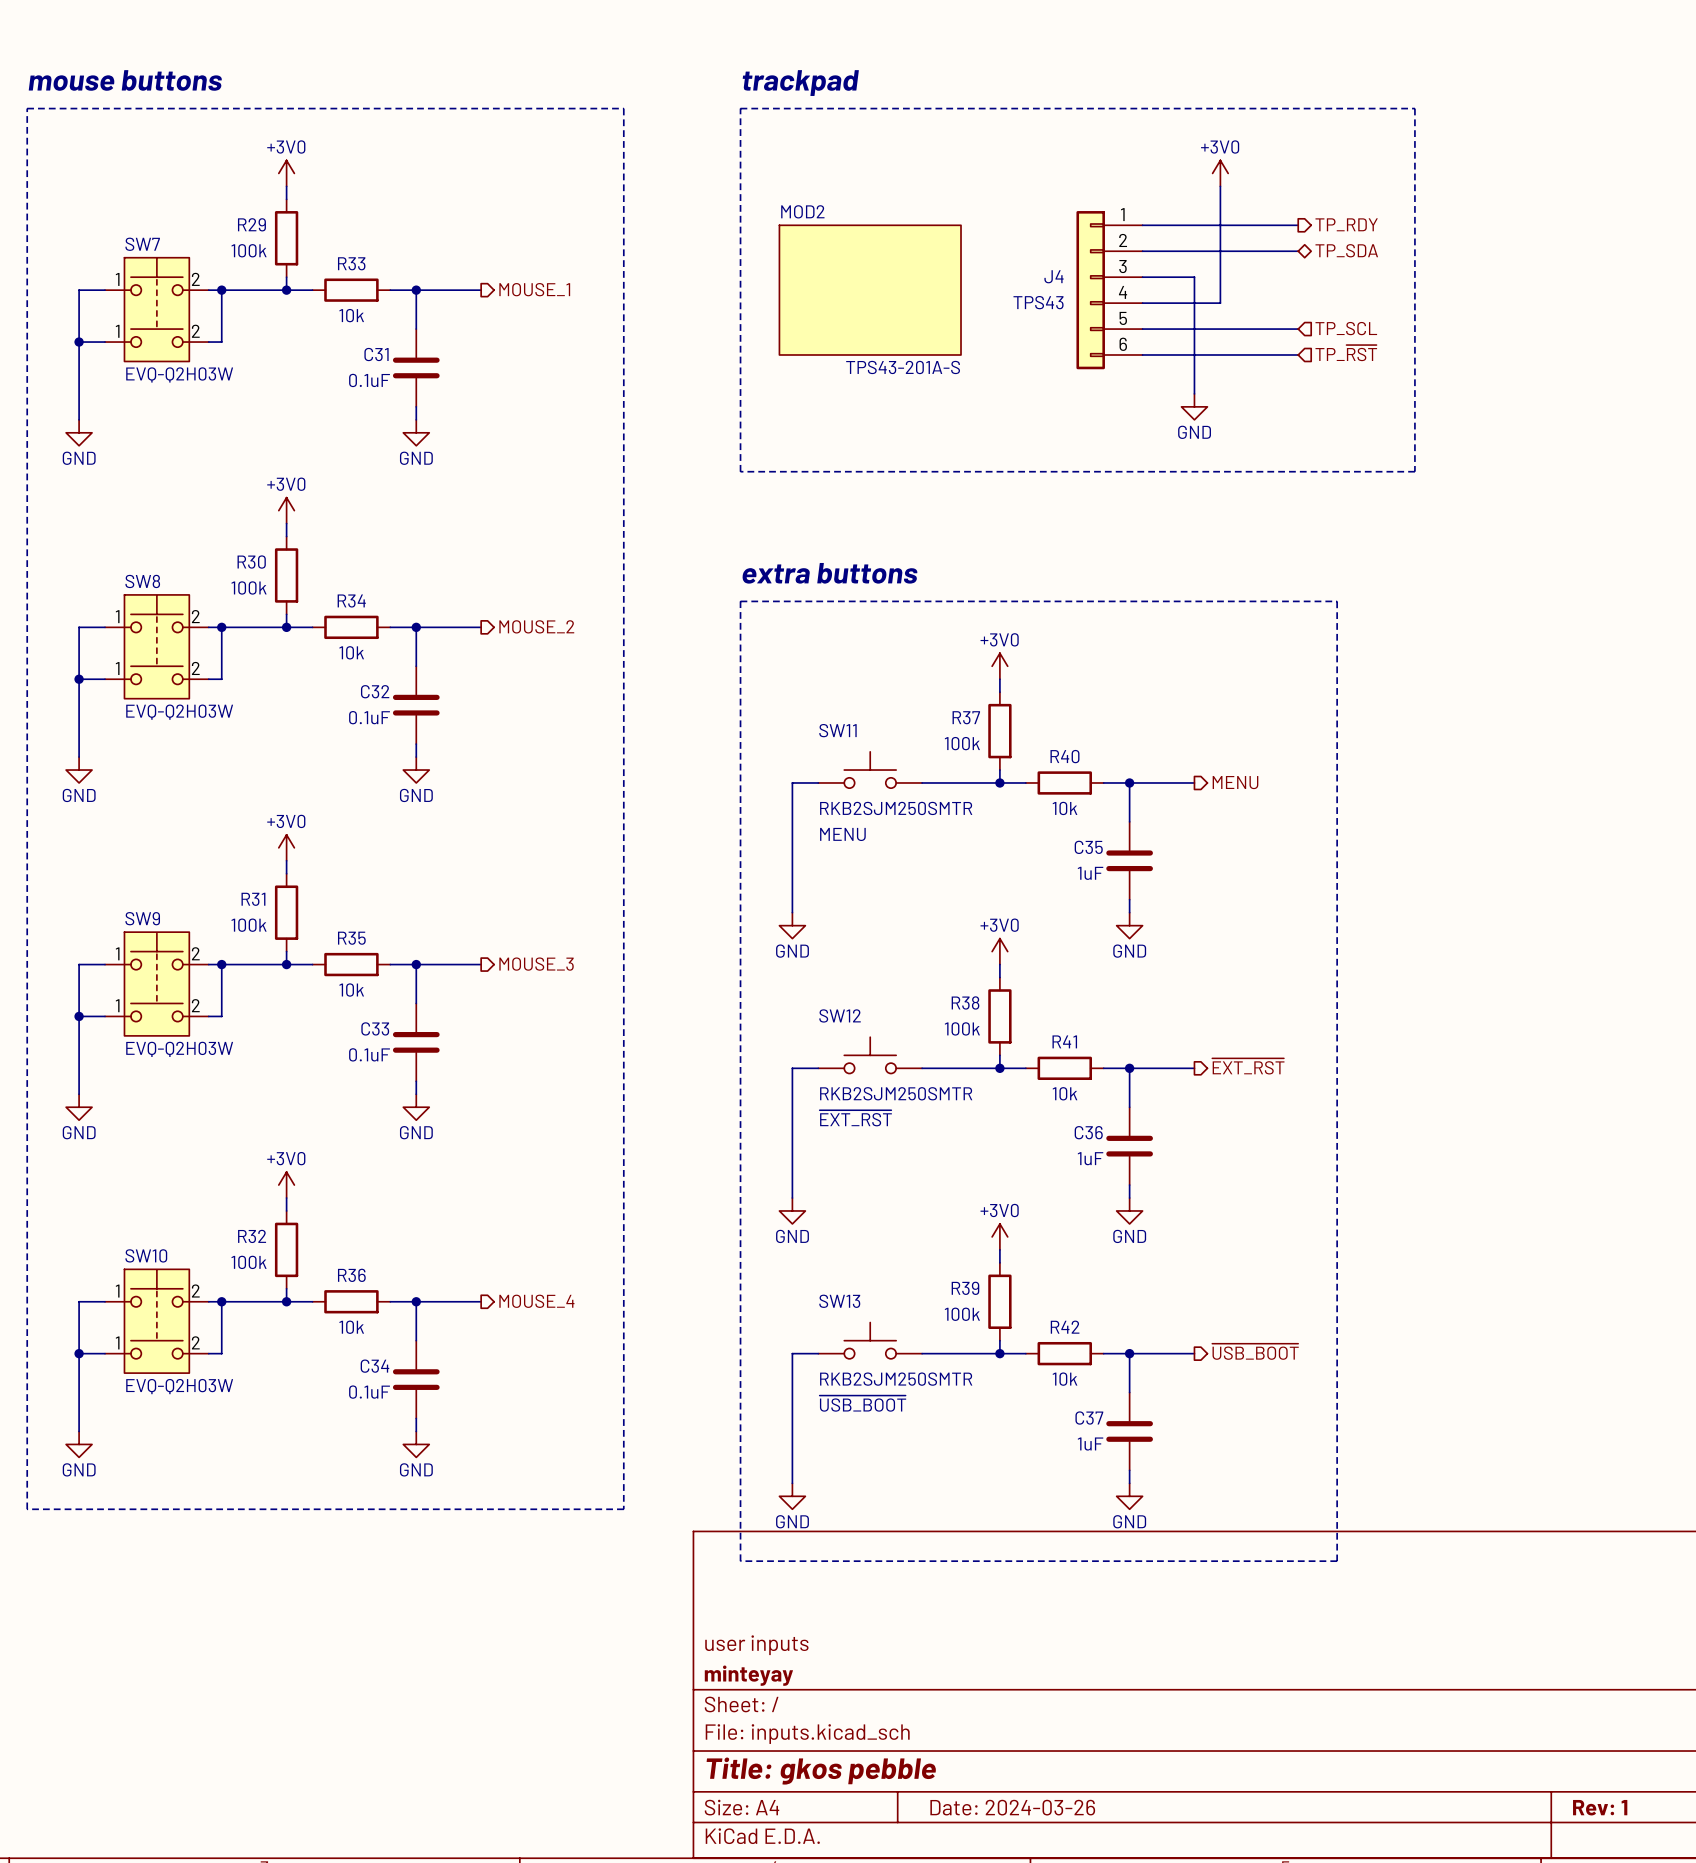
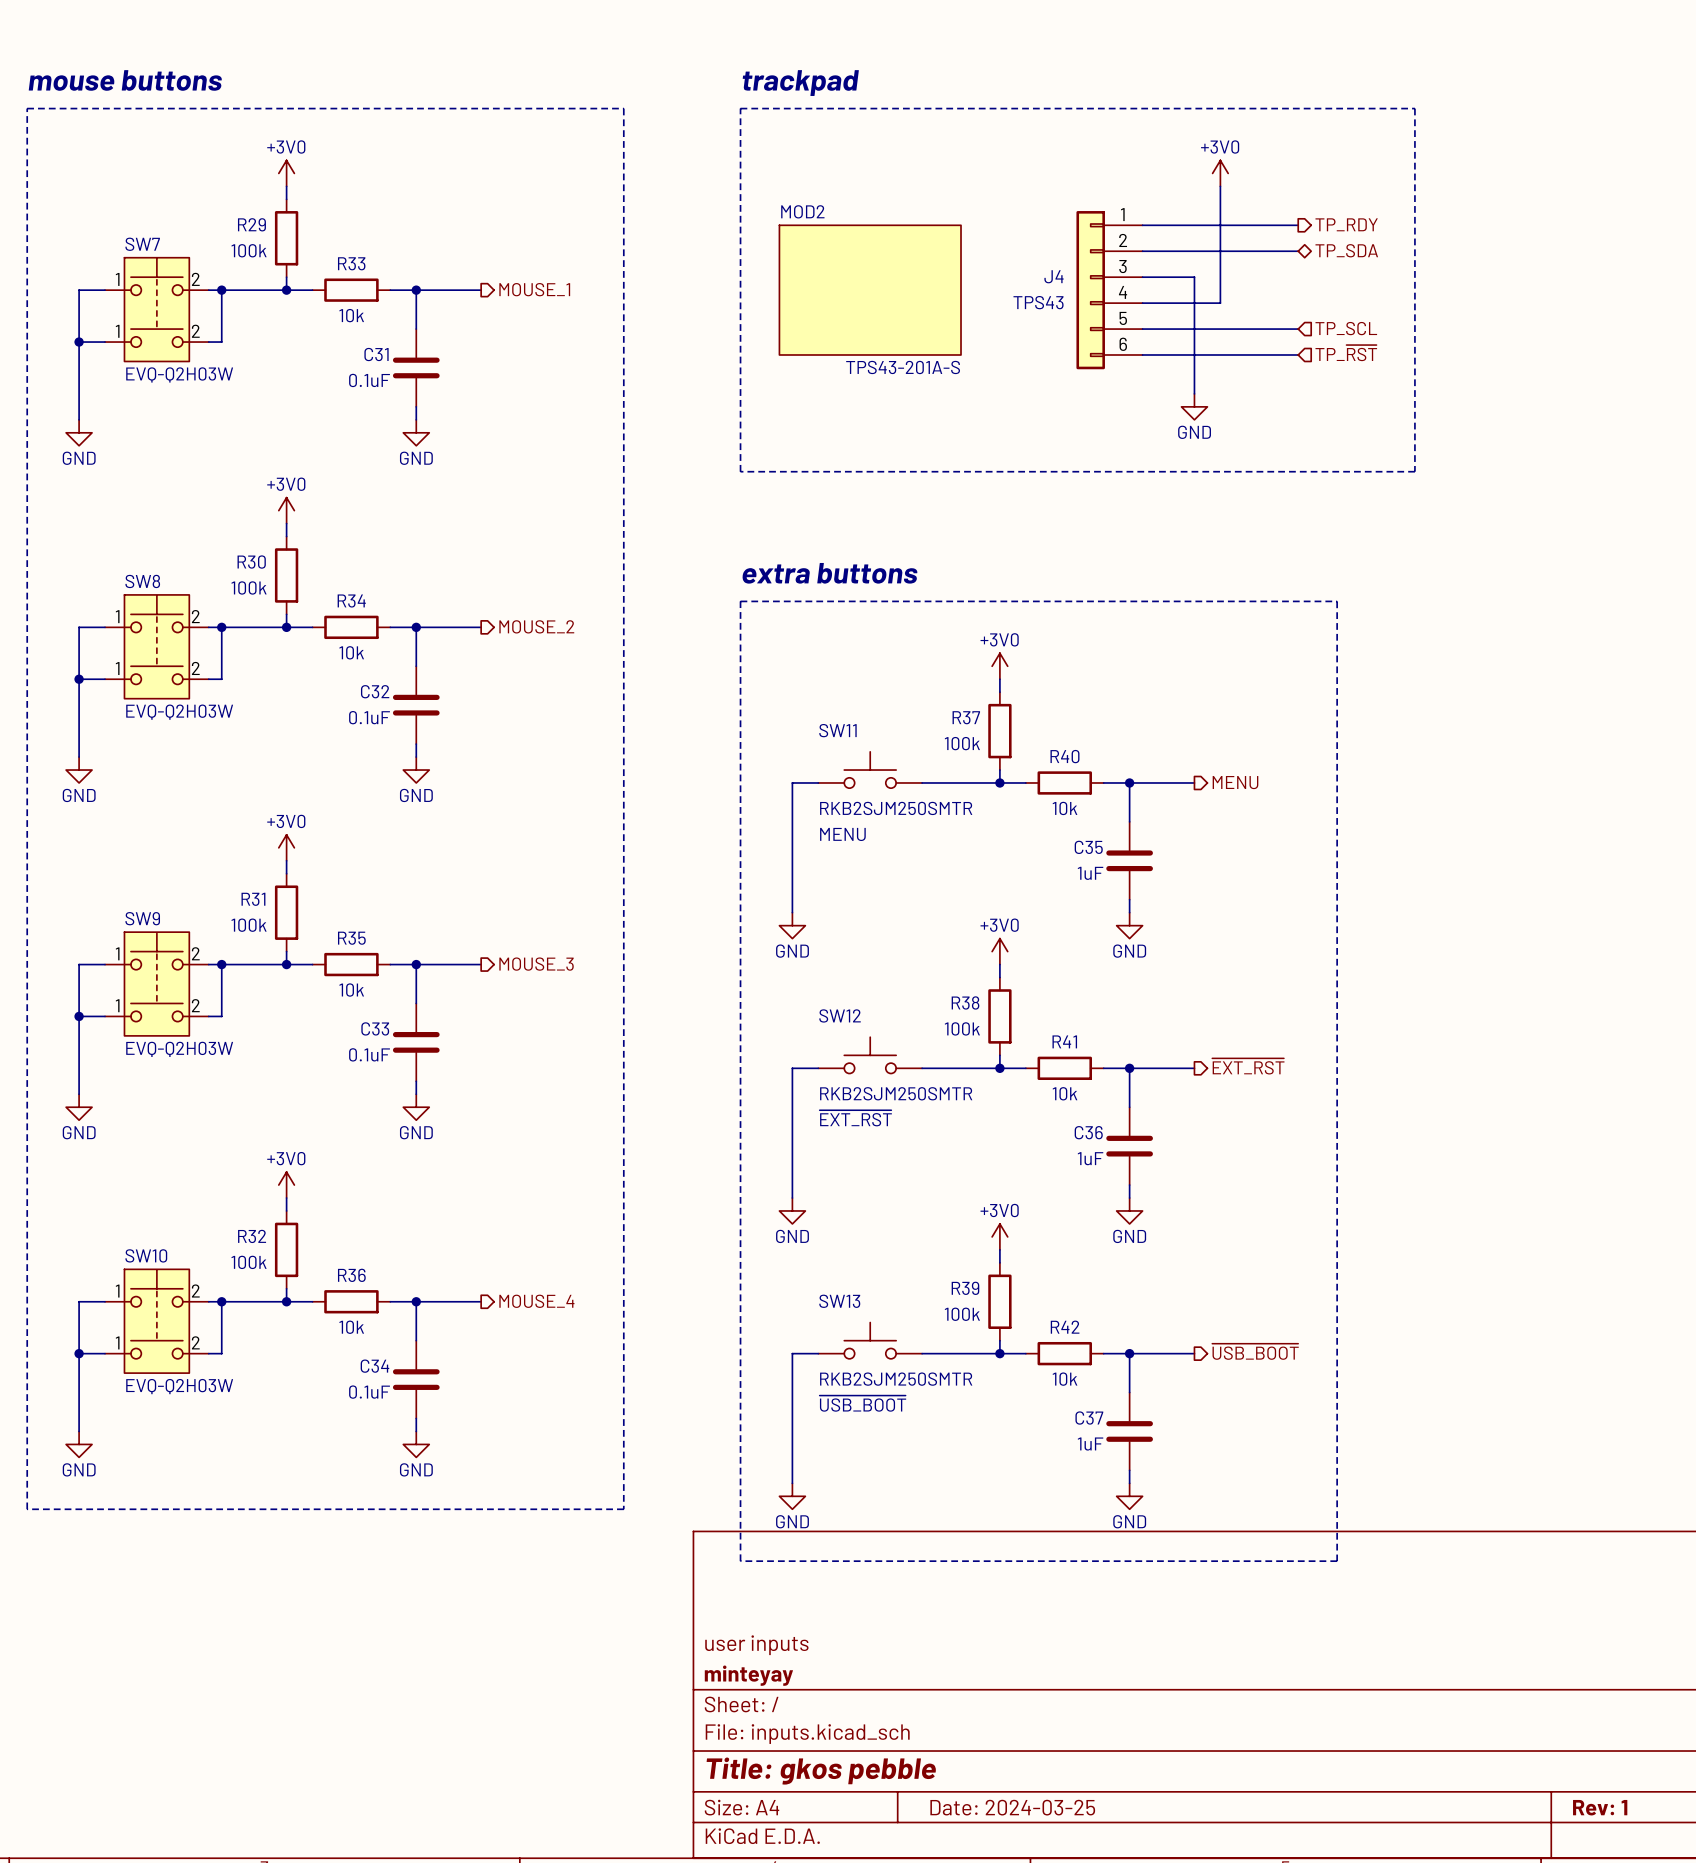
title block: Date: 2024-03-26 (1012, 1807) -> Date: 2024-03-25 (1012, 1807)

